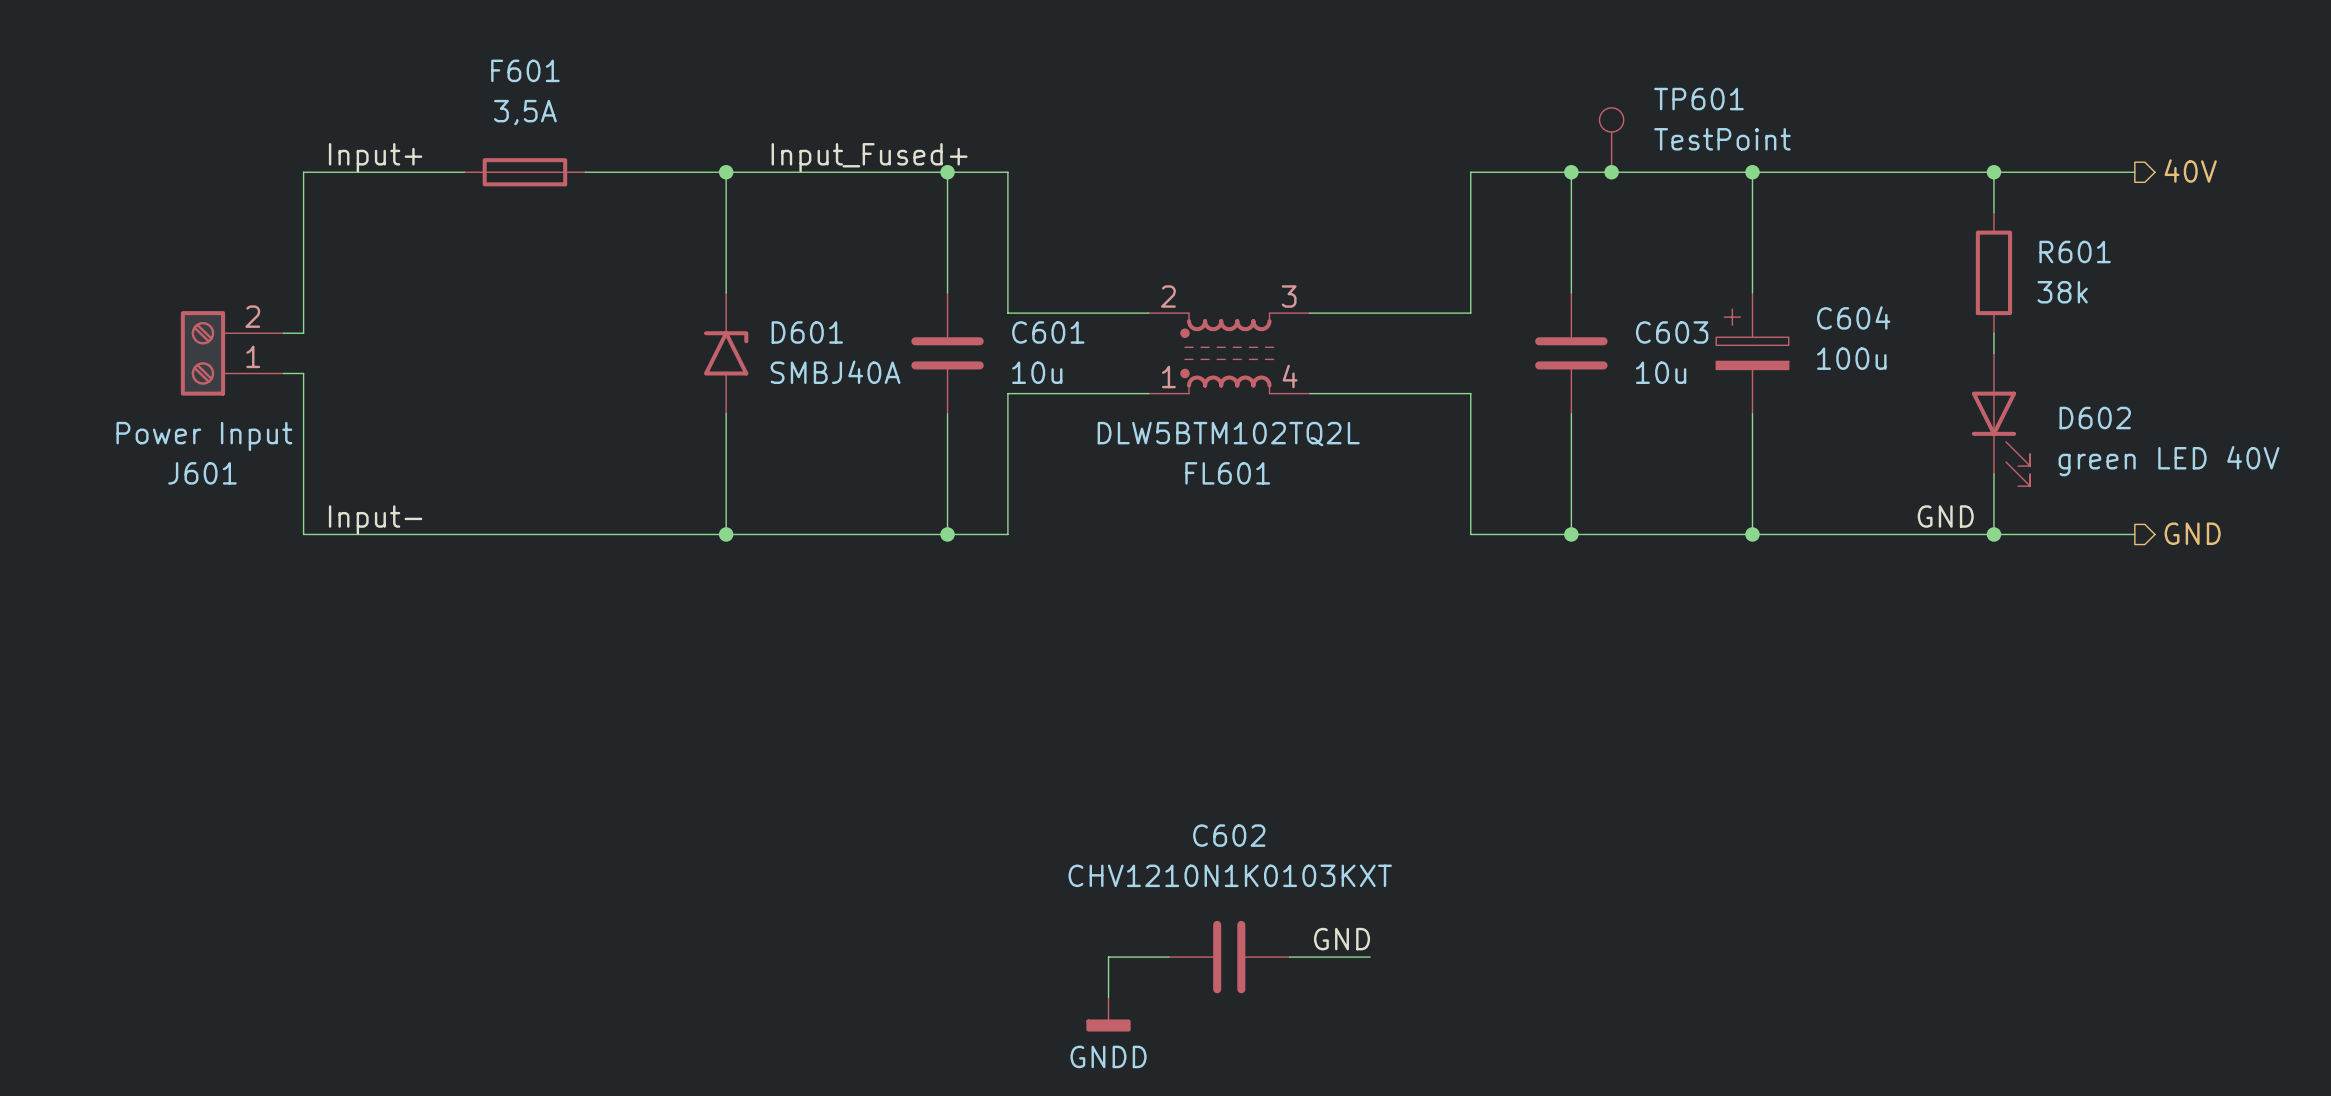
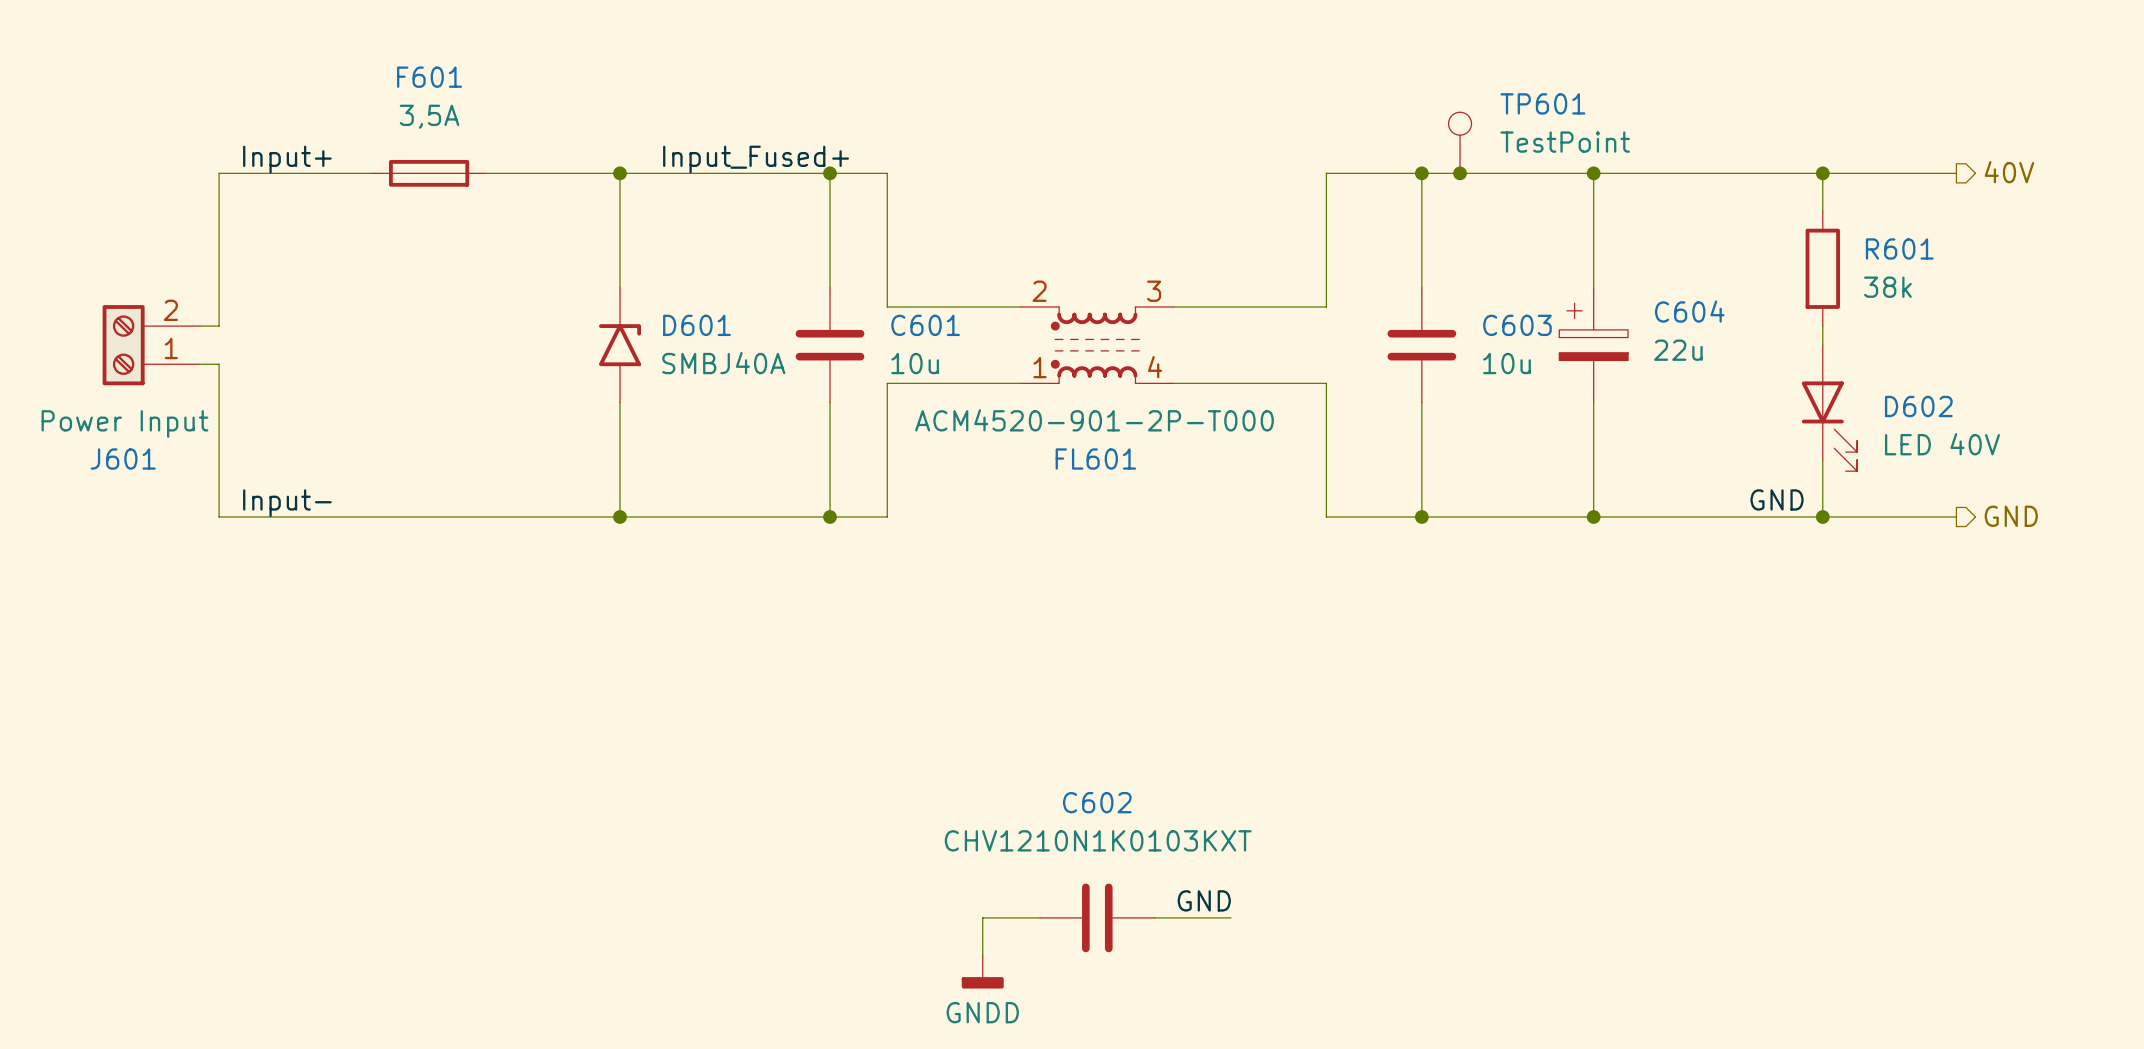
C604 value: 100u (1851, 358) -> 22u (1678, 350)
FL601 value: DLW5BTM102TQ2L (1228, 434) -> ACM4520-901-2P-T000 (1094, 420)
D602 value: green LED 40V (2169, 461) -> LED 40V (1942, 444)

